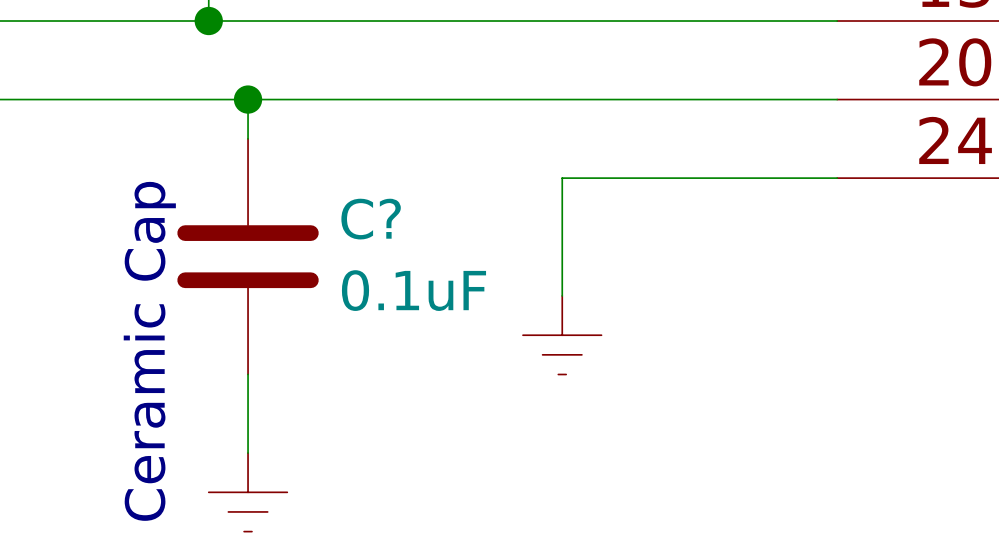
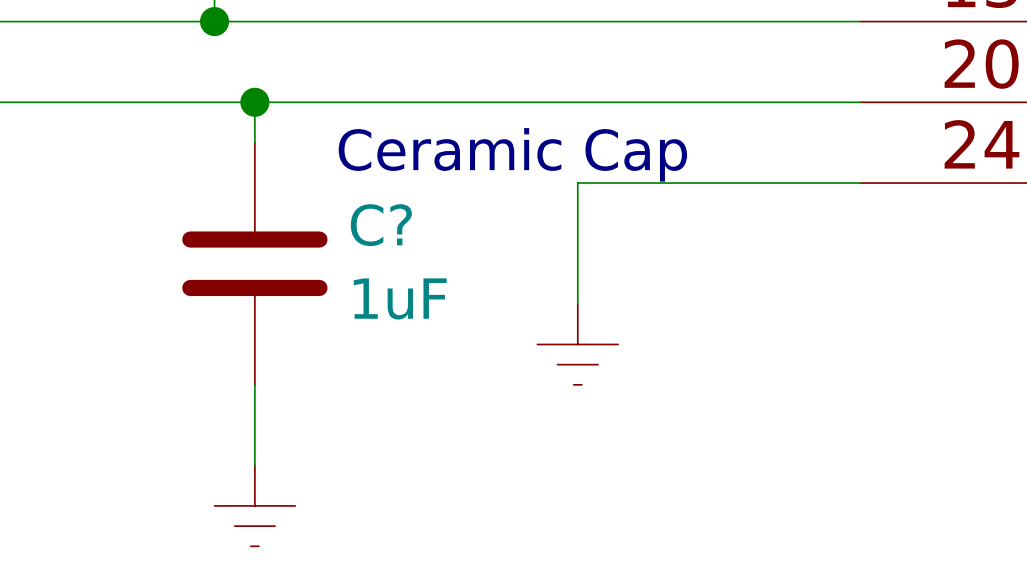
text: none -> Ceramic Cap (512, 154)
C? value: 0.1uF (413, 290) -> 1uF (400, 298)
text: Ceramic Cap (149, 351) -> none

